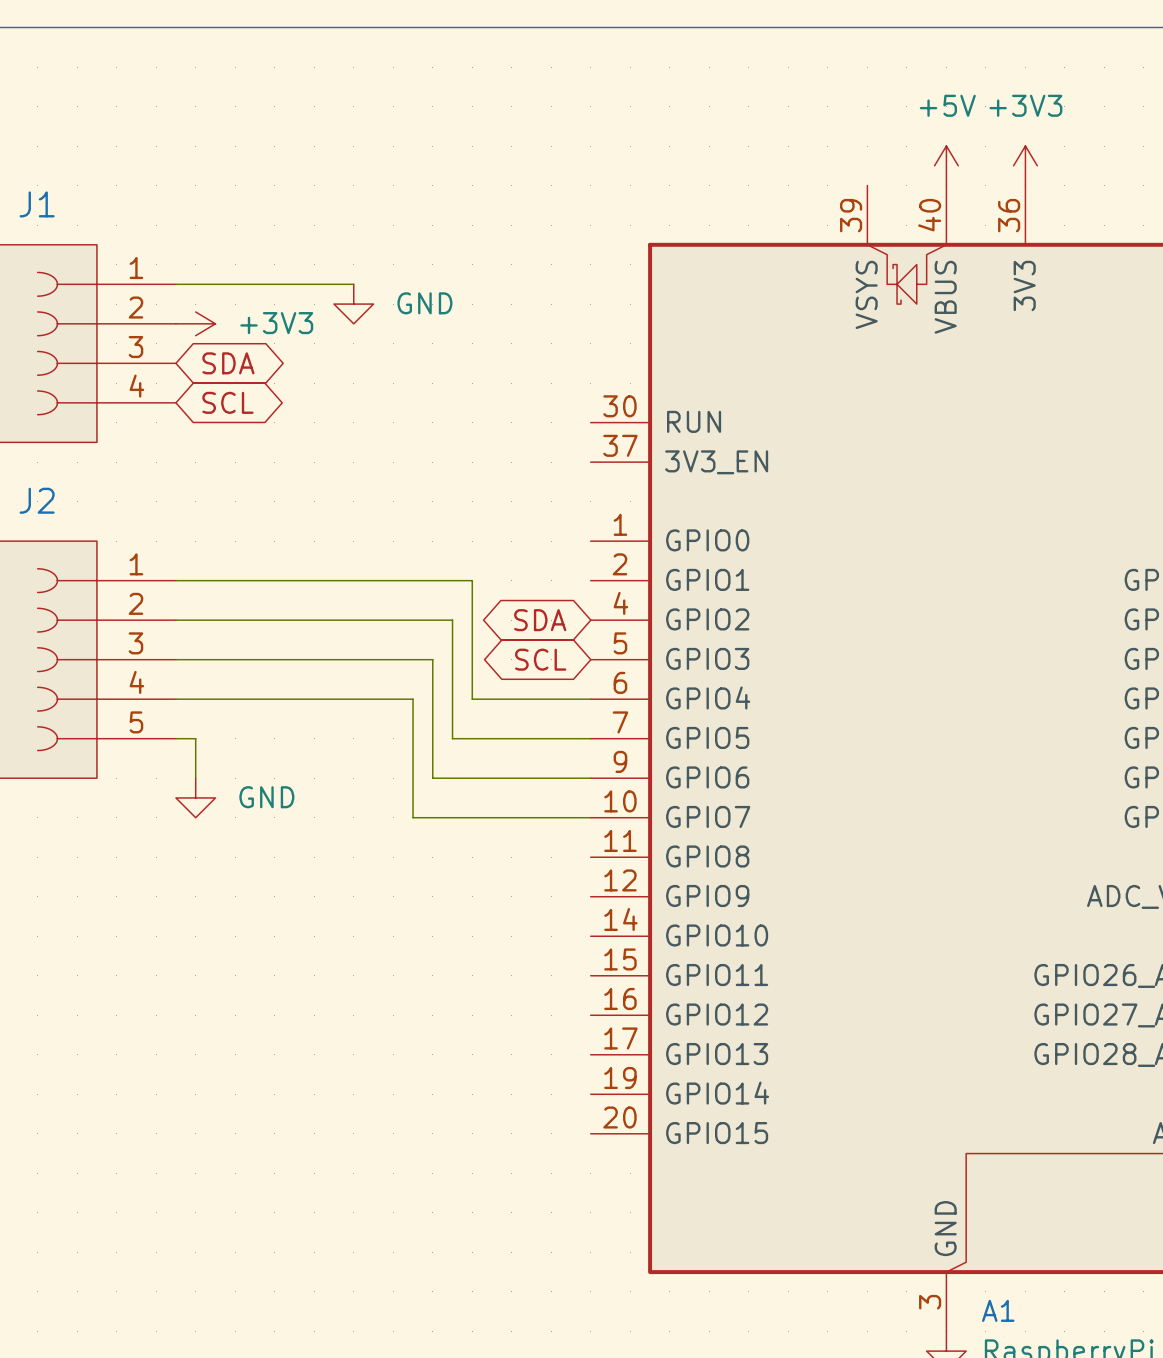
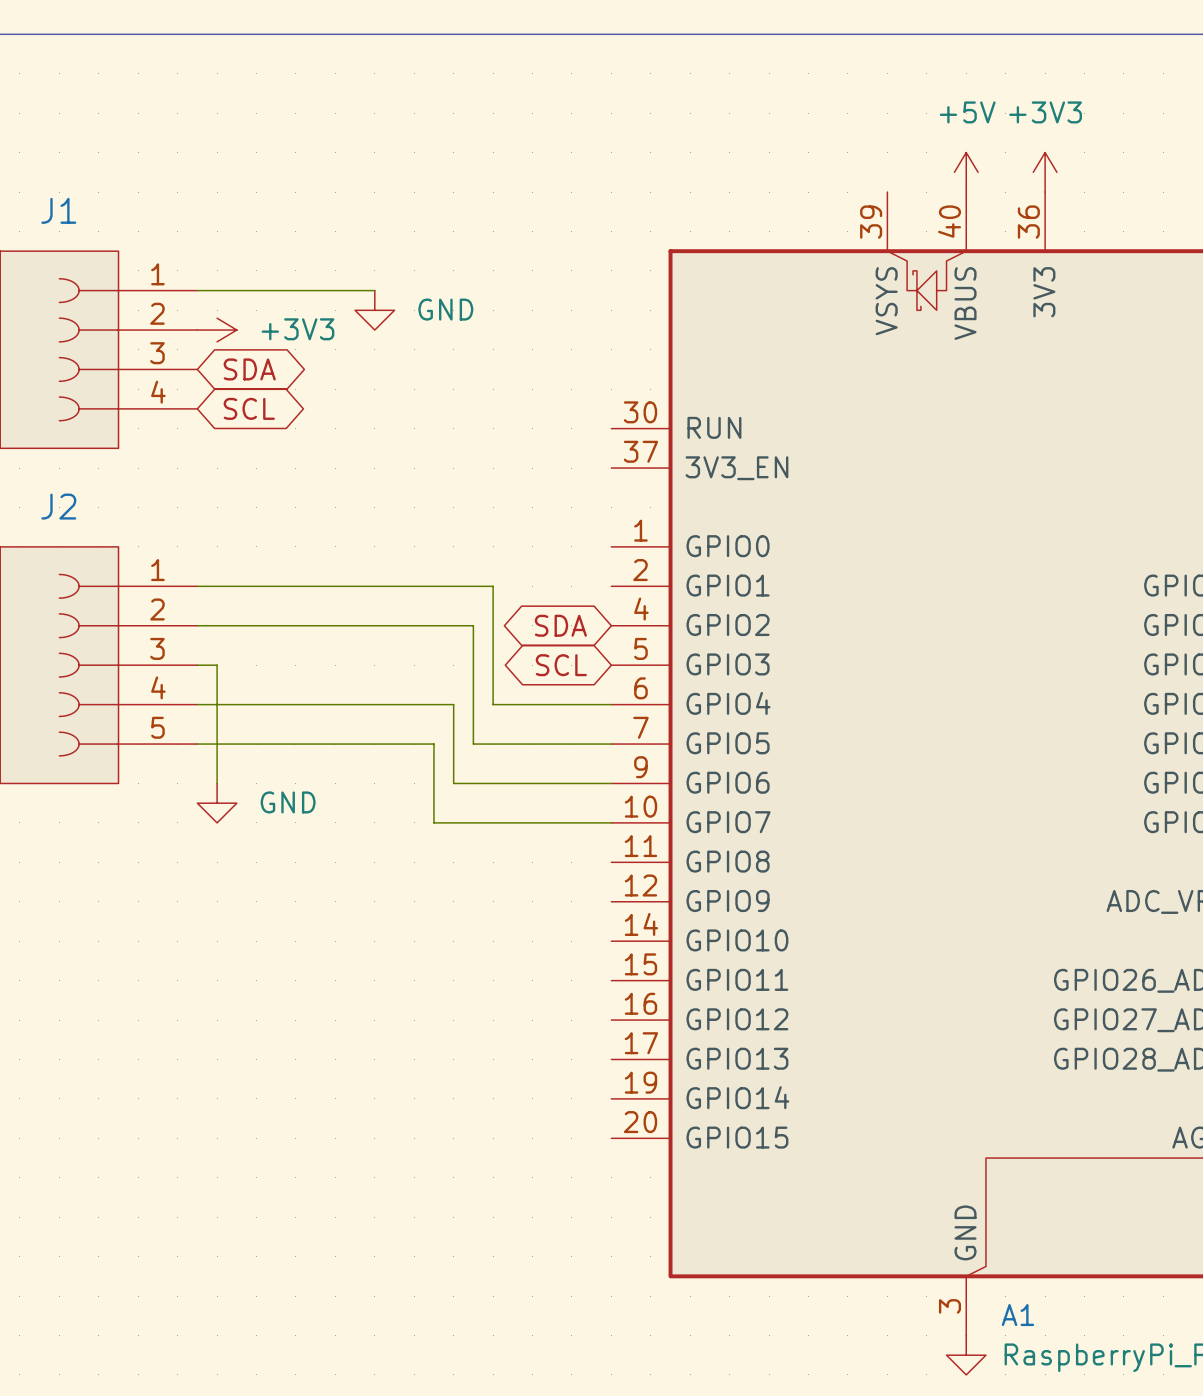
wire: (195, 659) (432, 659) (432, 699) -> (217, 665) (217, 744) (433, 744)
wire: (413, 699) (413, 738) -> (433, 704) (453, 704)

